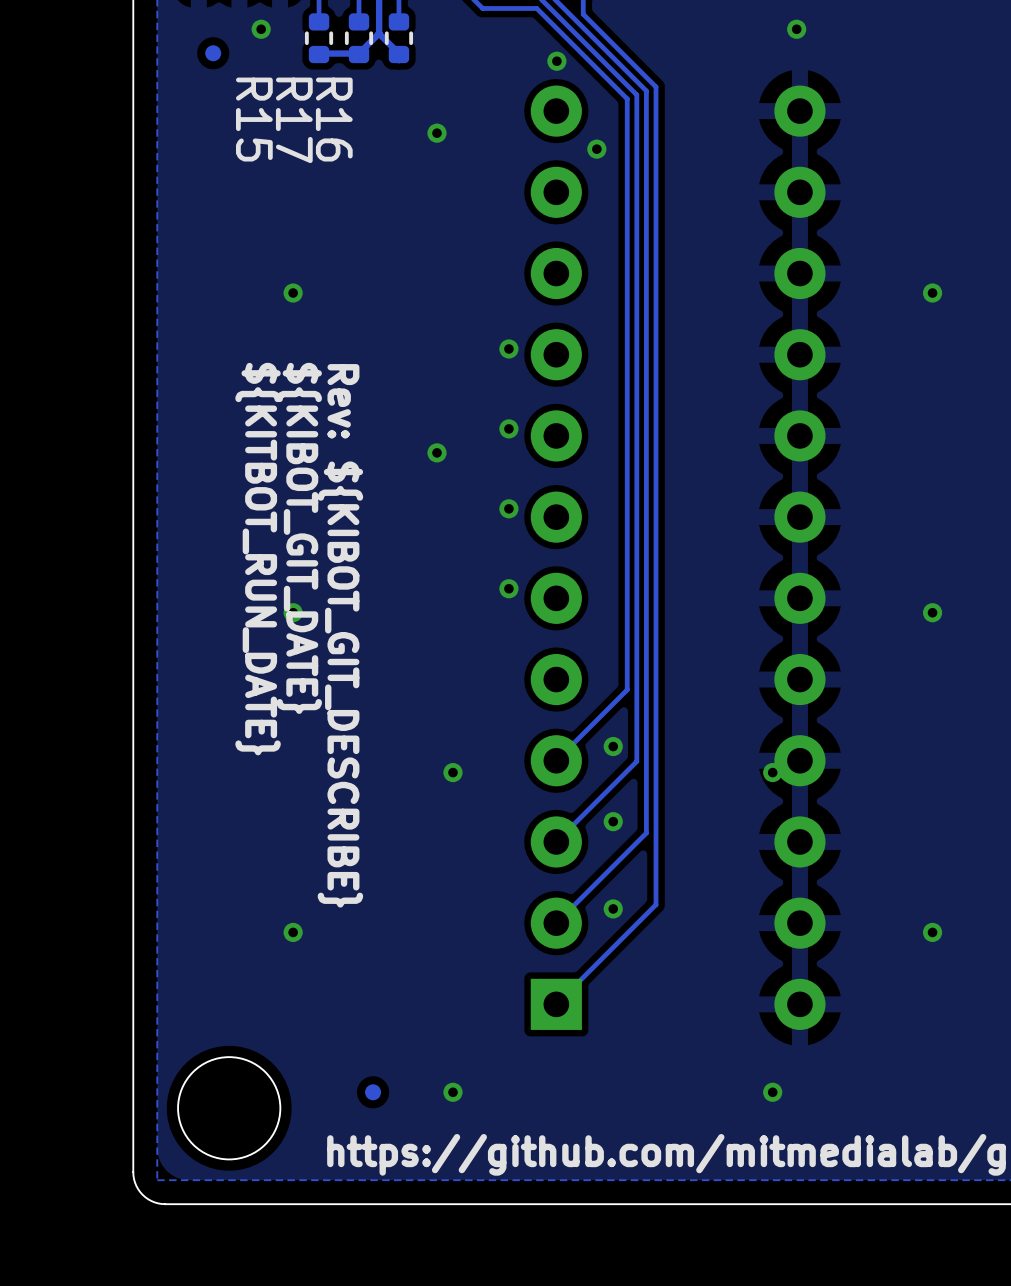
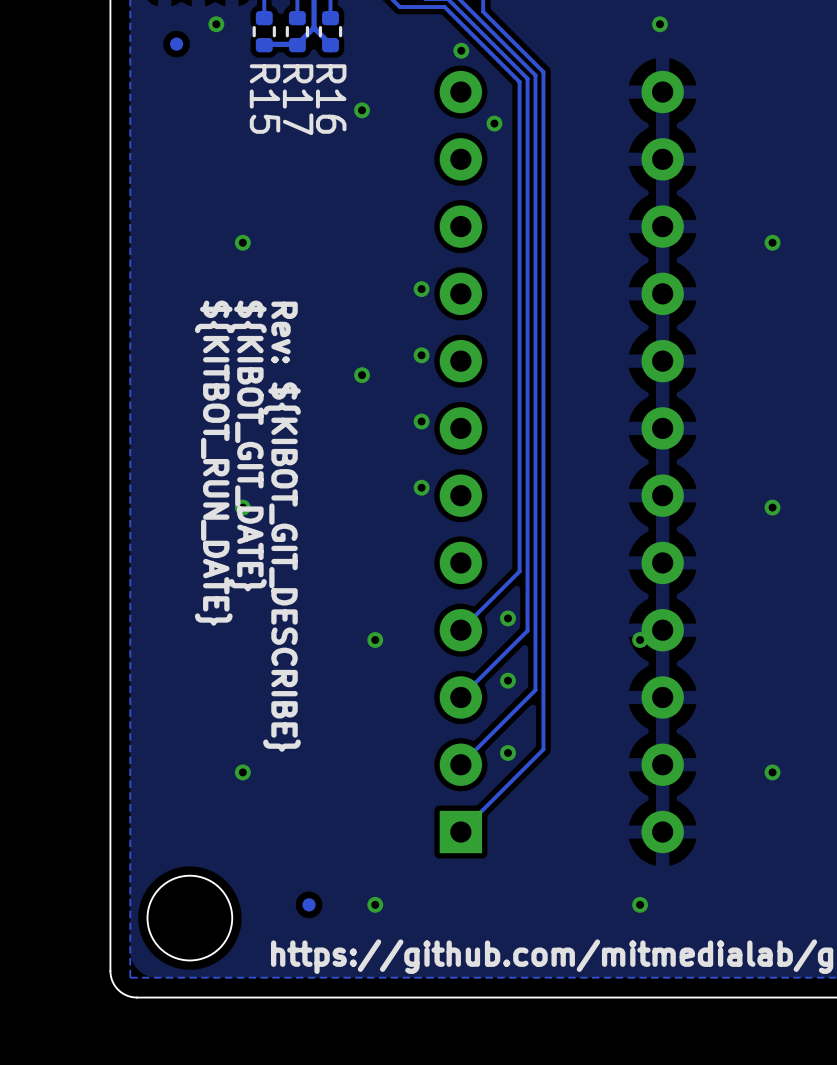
R15 name position: R15 (254, 119) -> R15 (265, 99)
R16 name position: R16 (334, 119) -> R16 (331, 99)
R17 name position: R17 (294, 120) -> R17 (298, 99)

